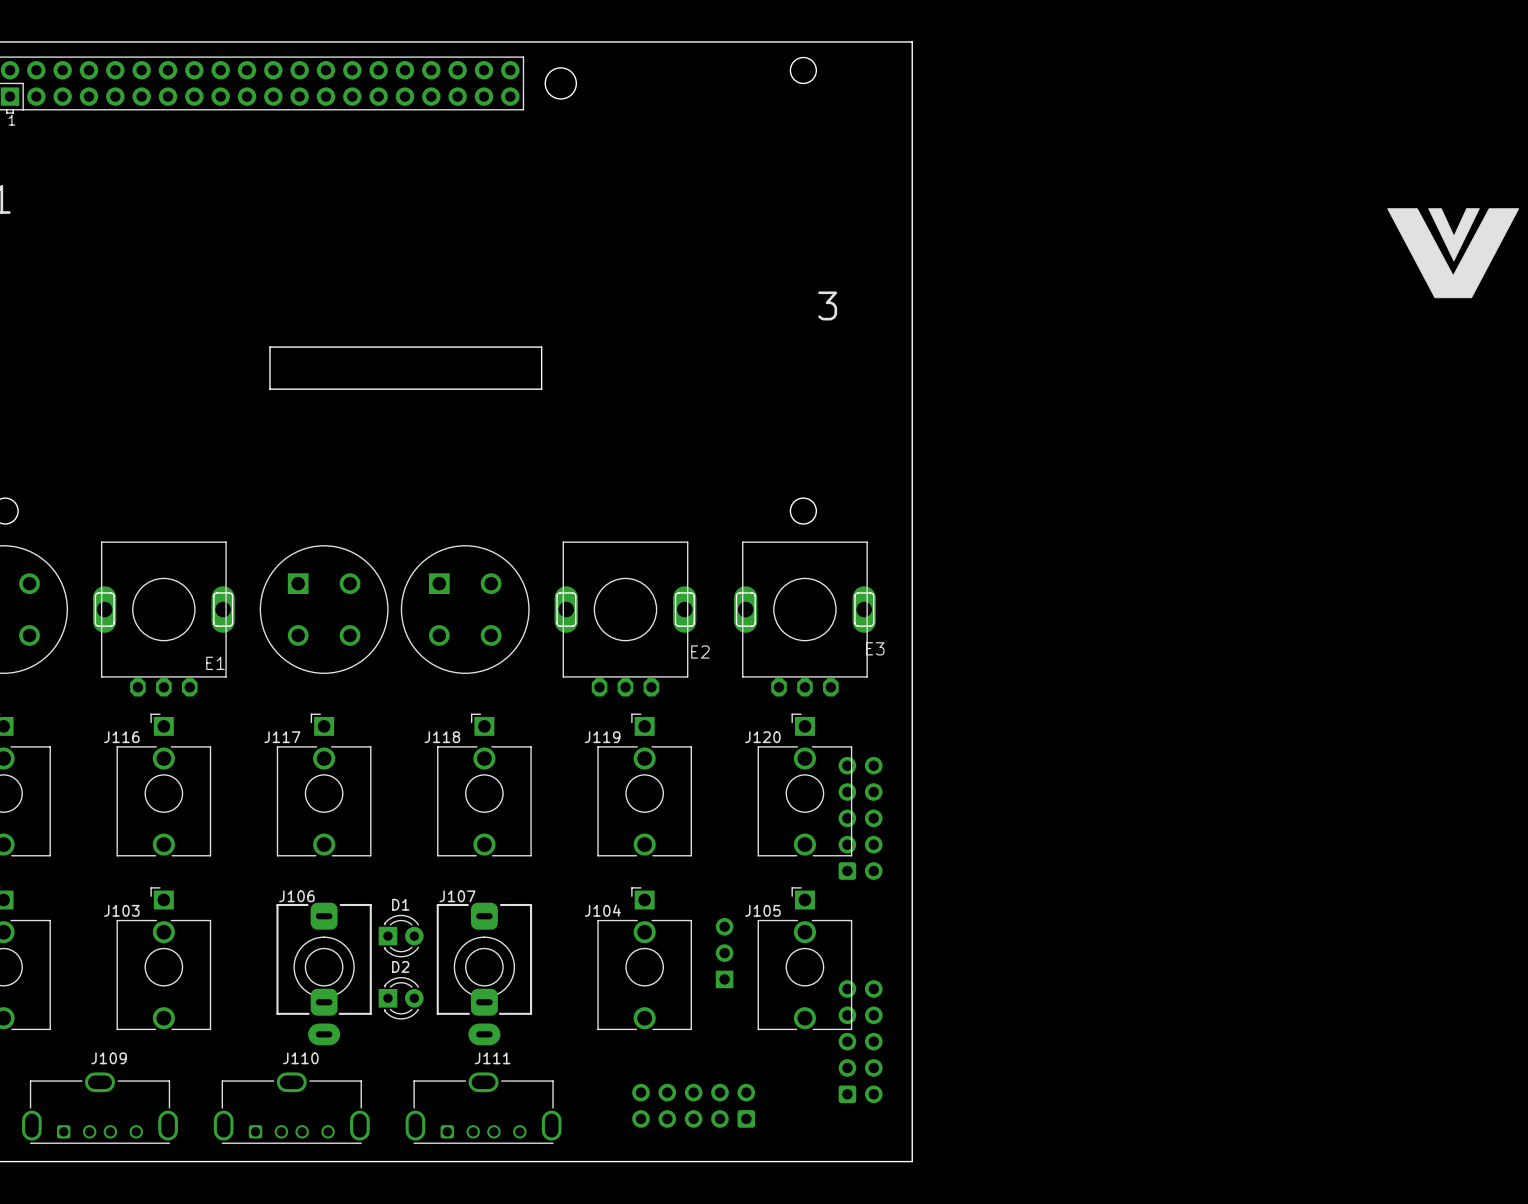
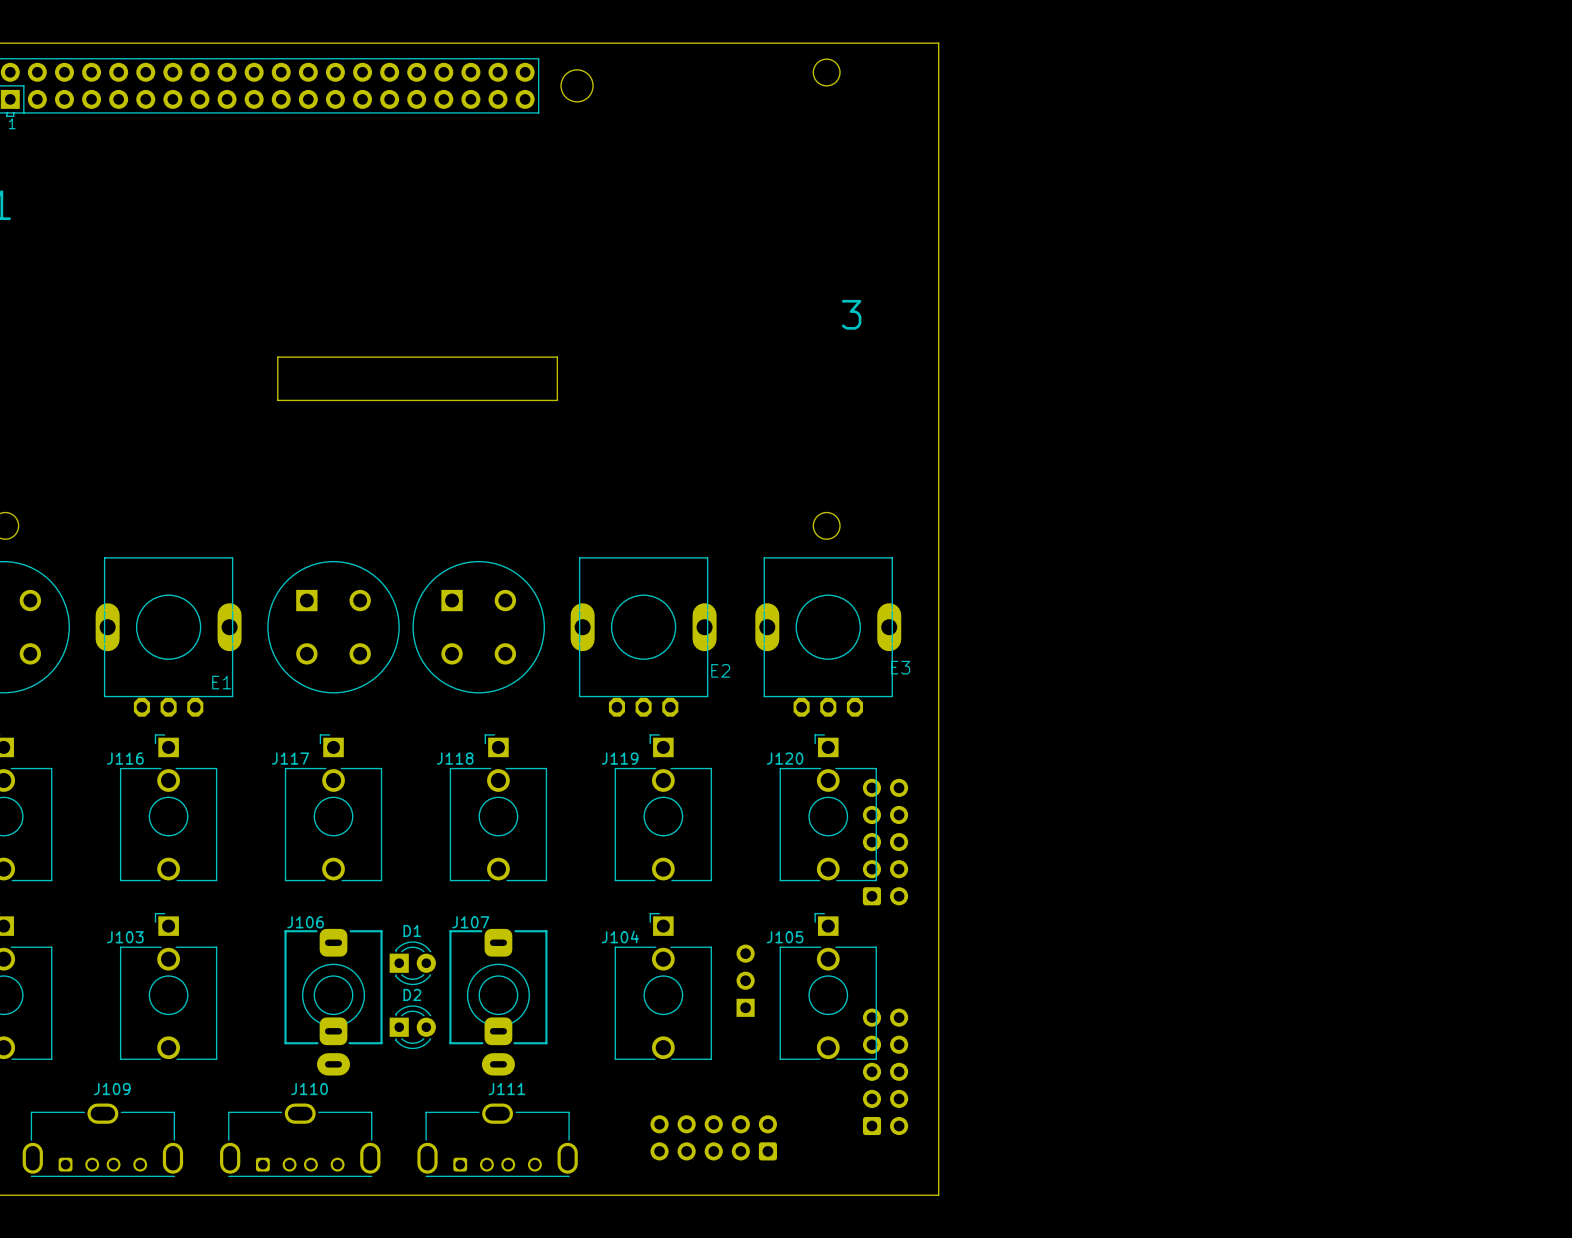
drawing: [1387, 208, 1520, 299] -> none

